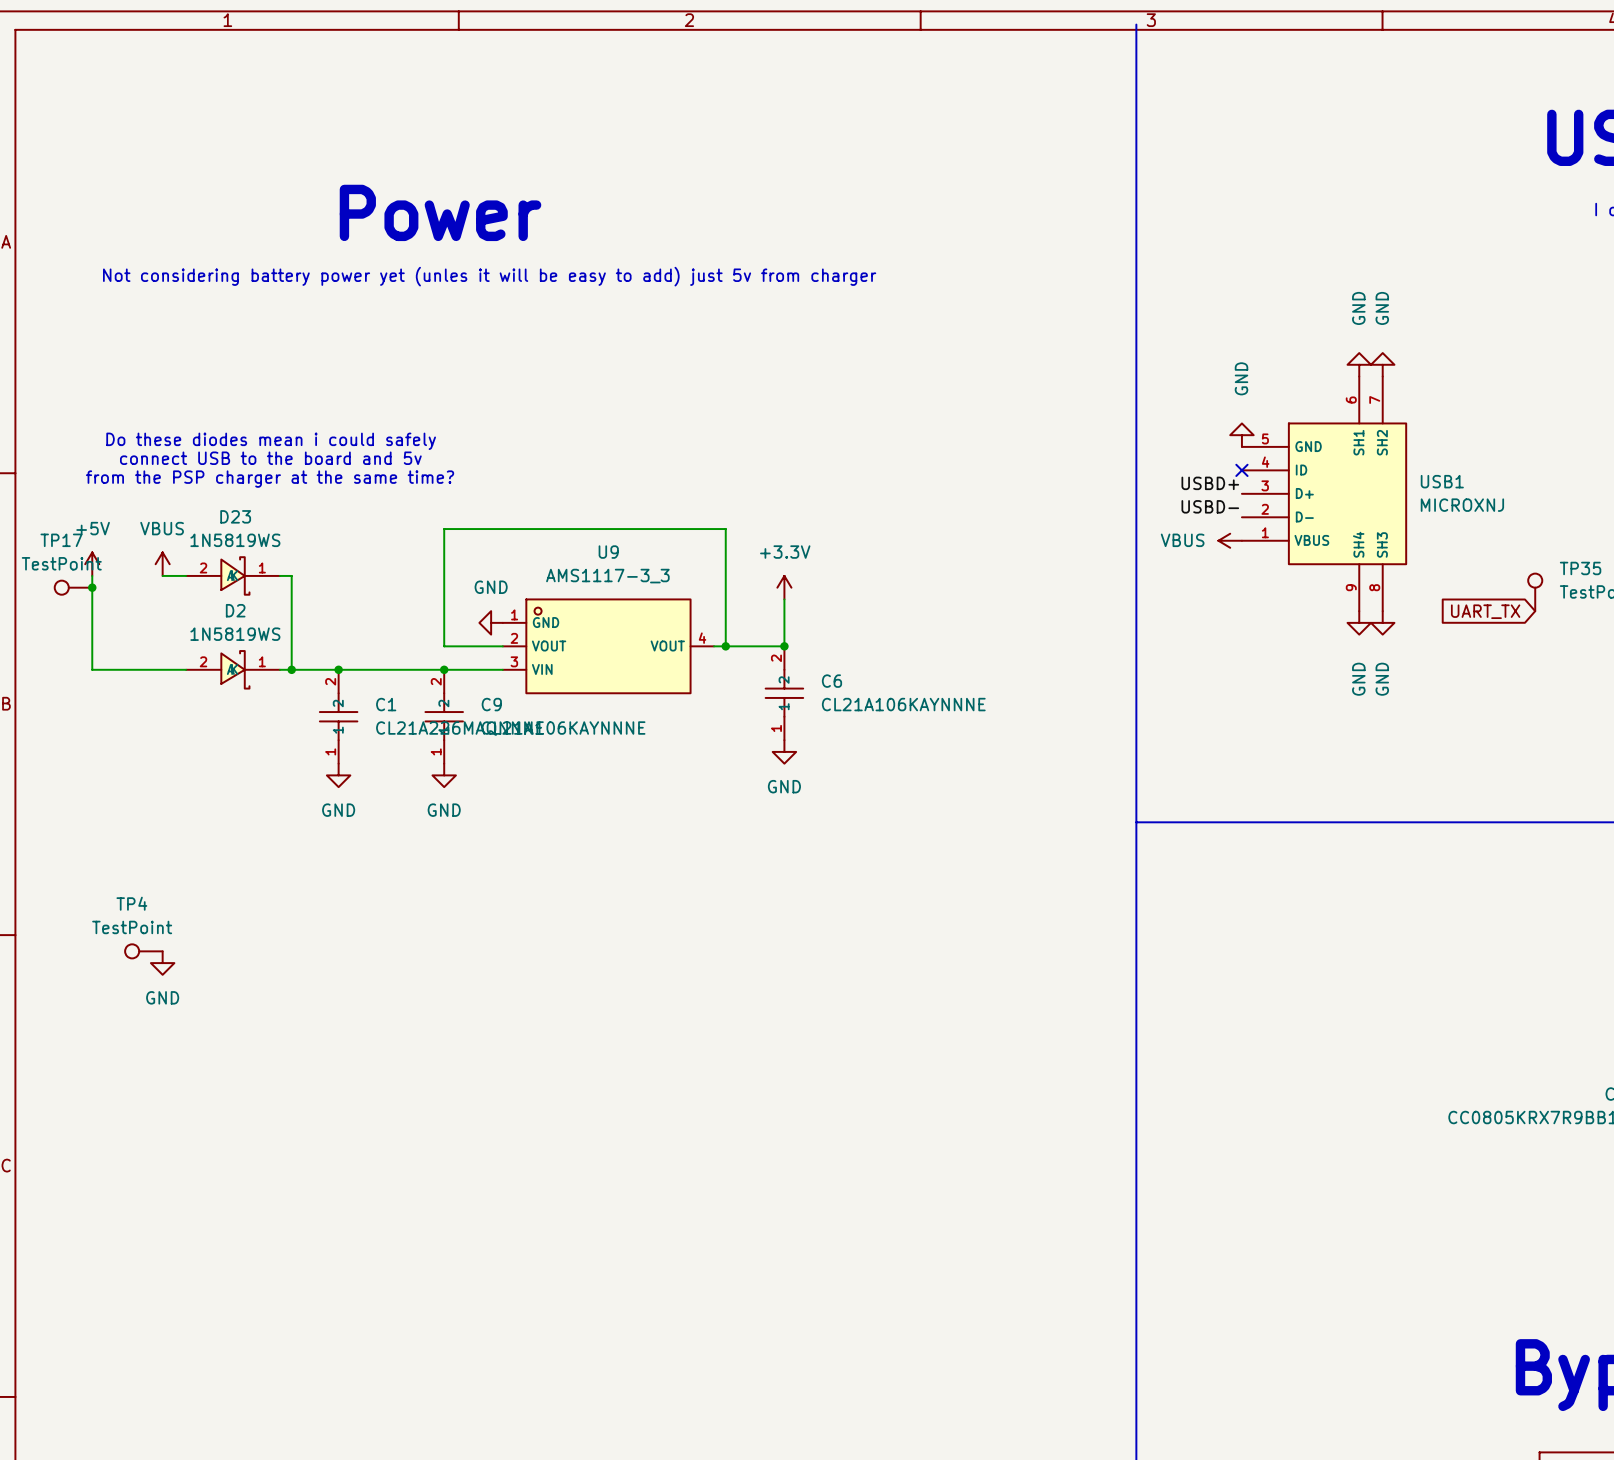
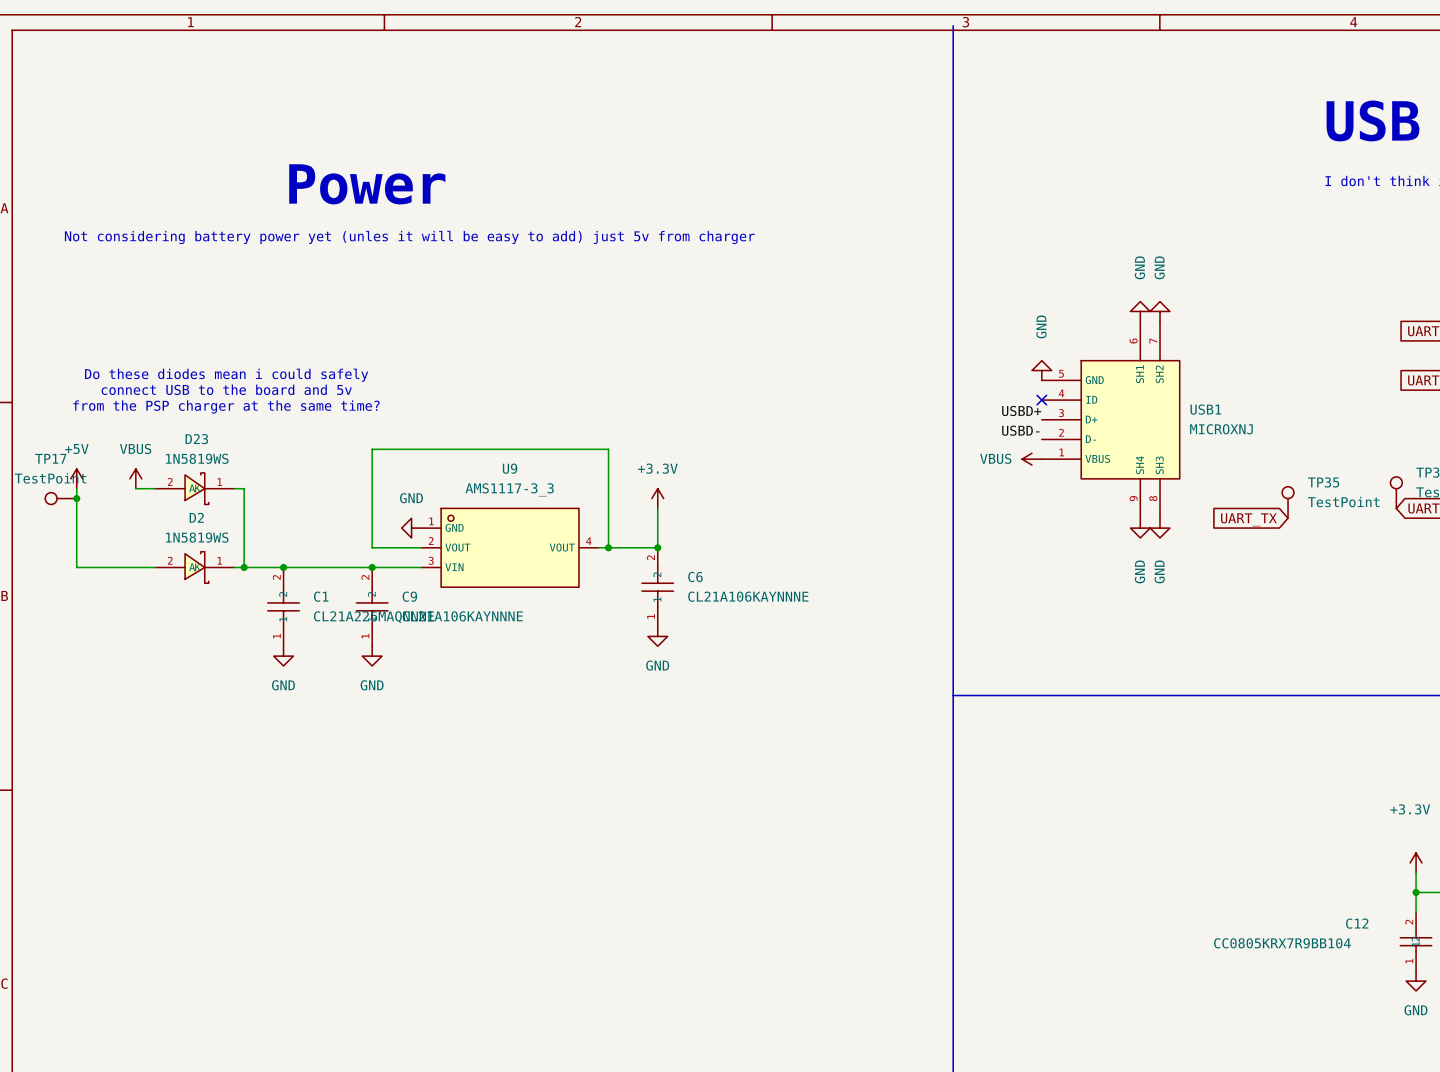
TP4: TestPoint (143, 951) -> none
power symbol: GND (162, 963) -> none

